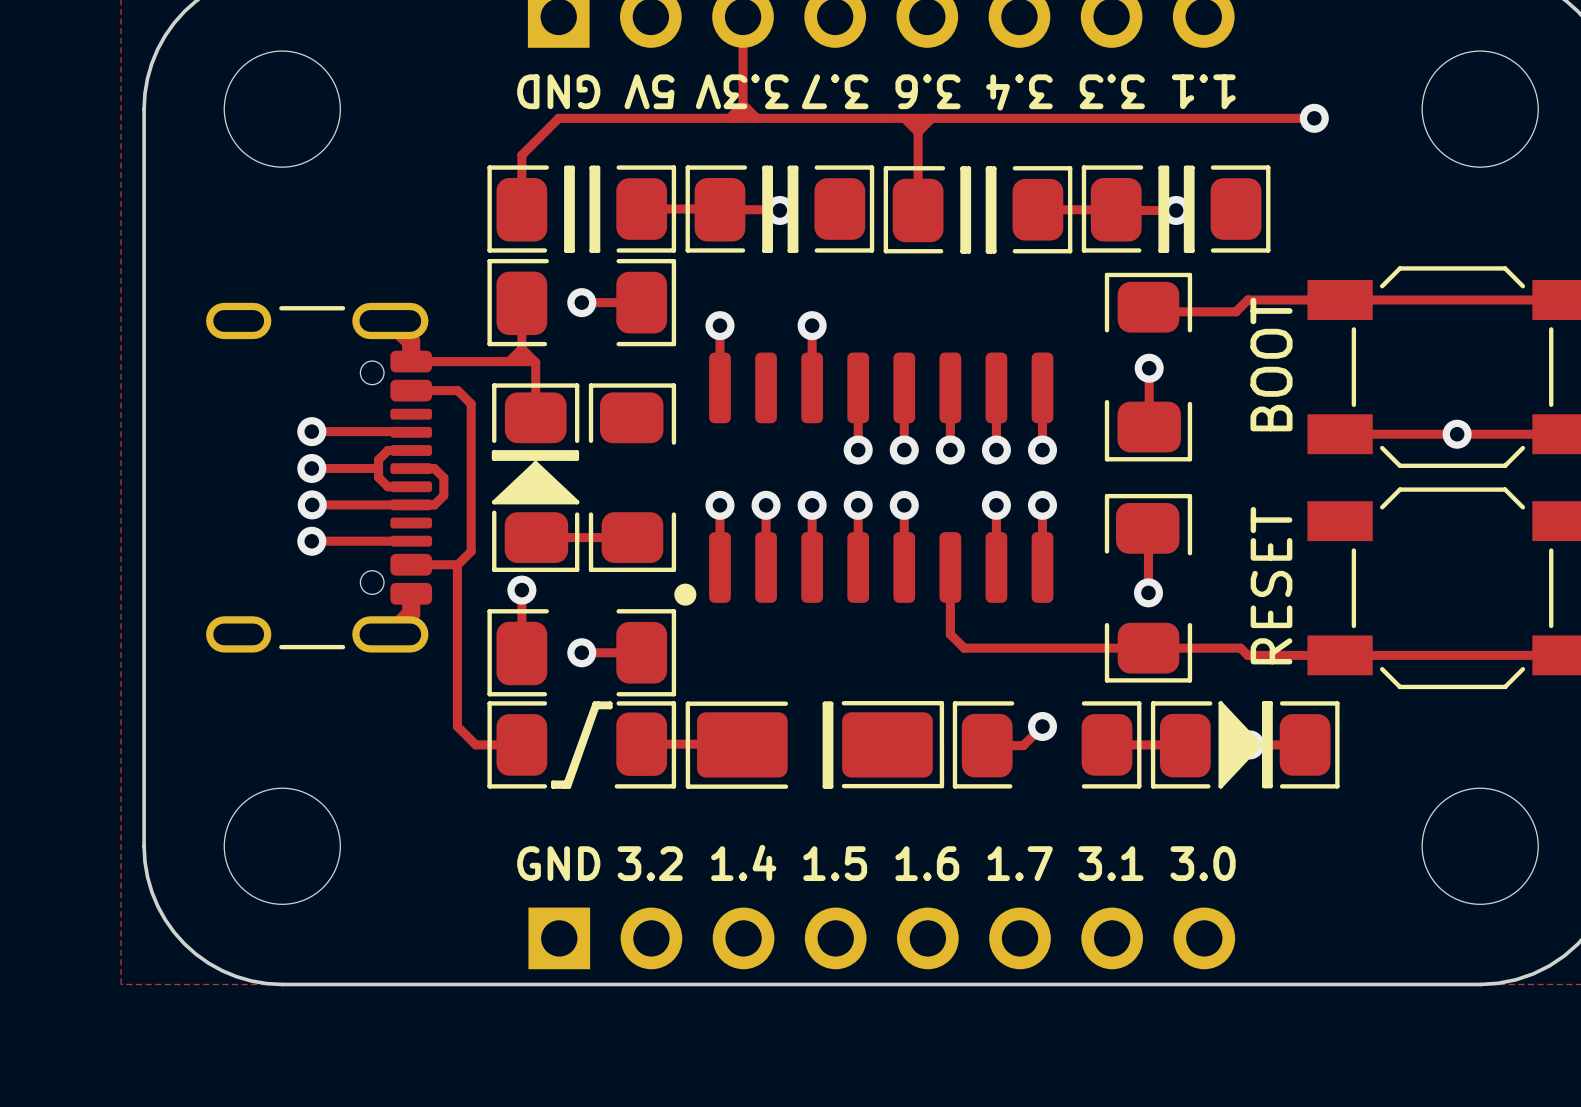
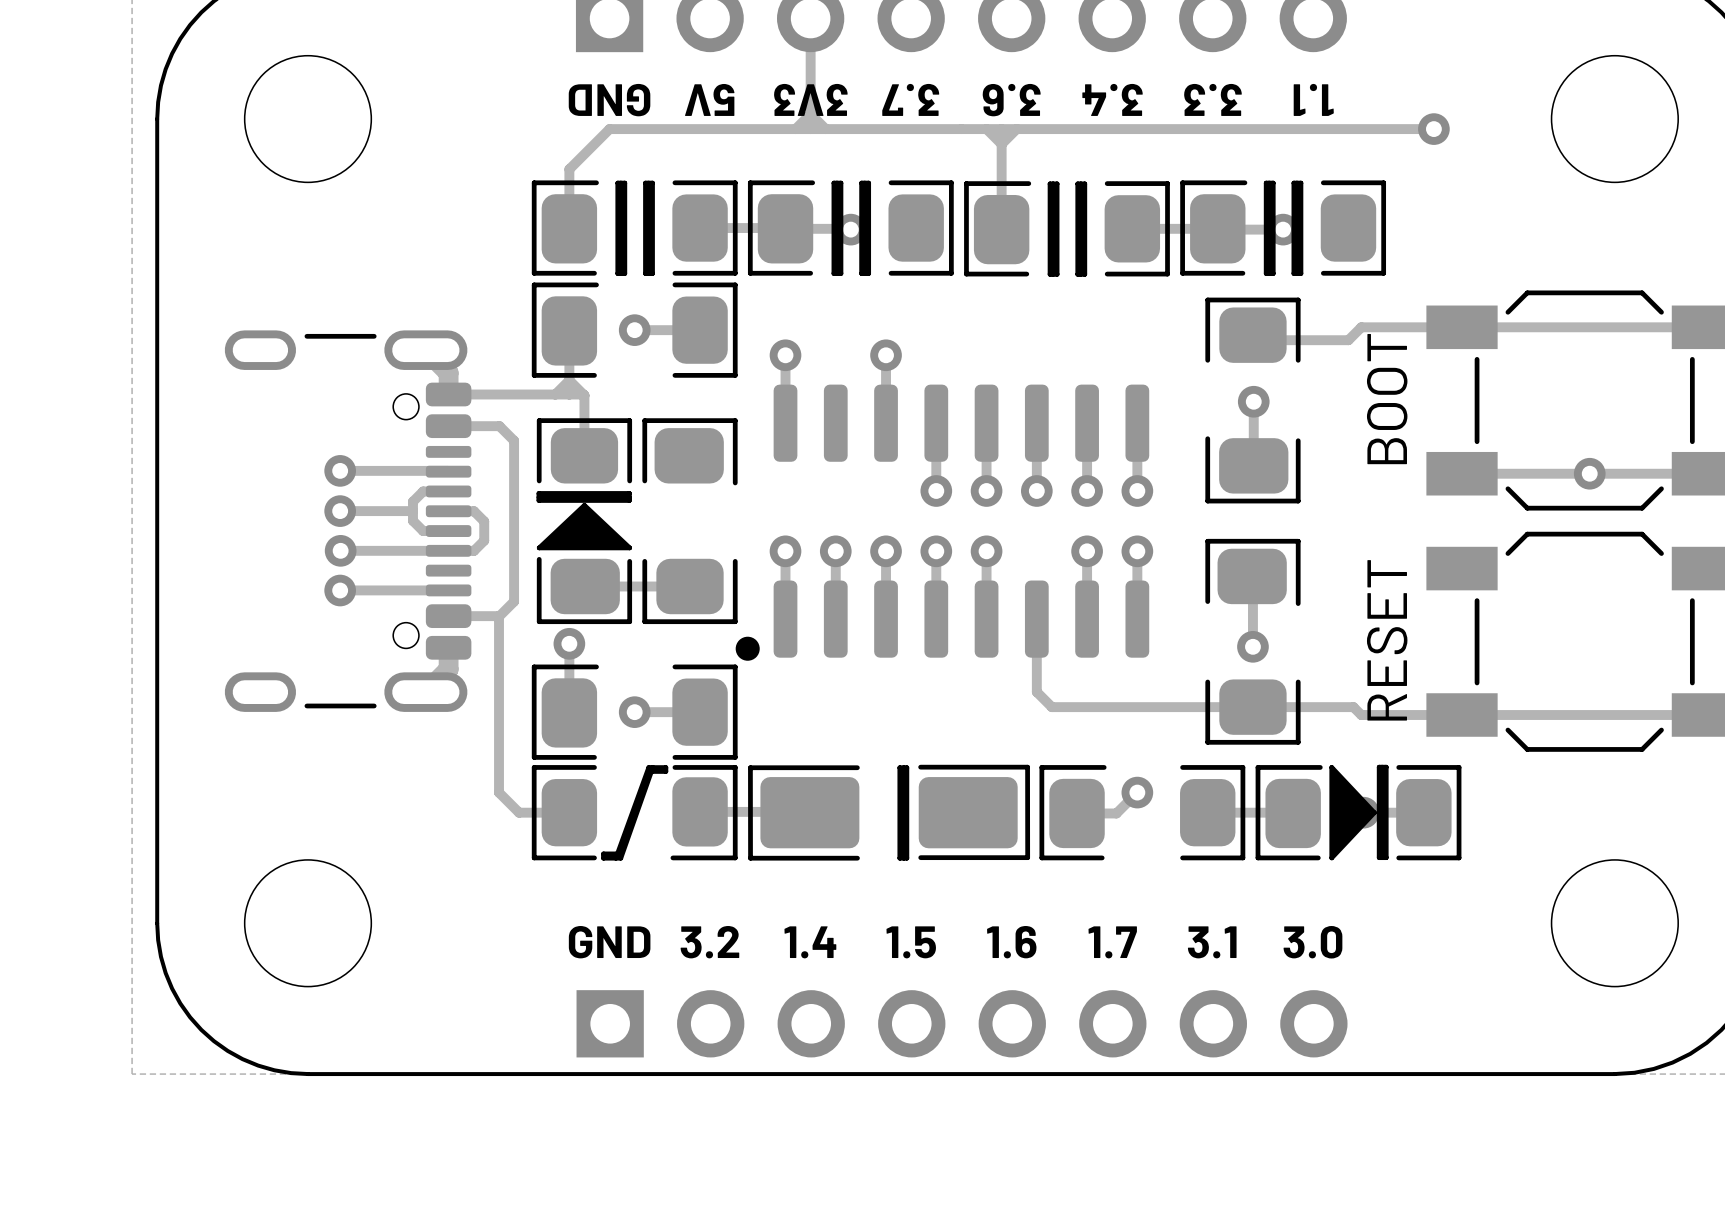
text: 3.3V (742, 91) -> 3V3 (810, 99)

